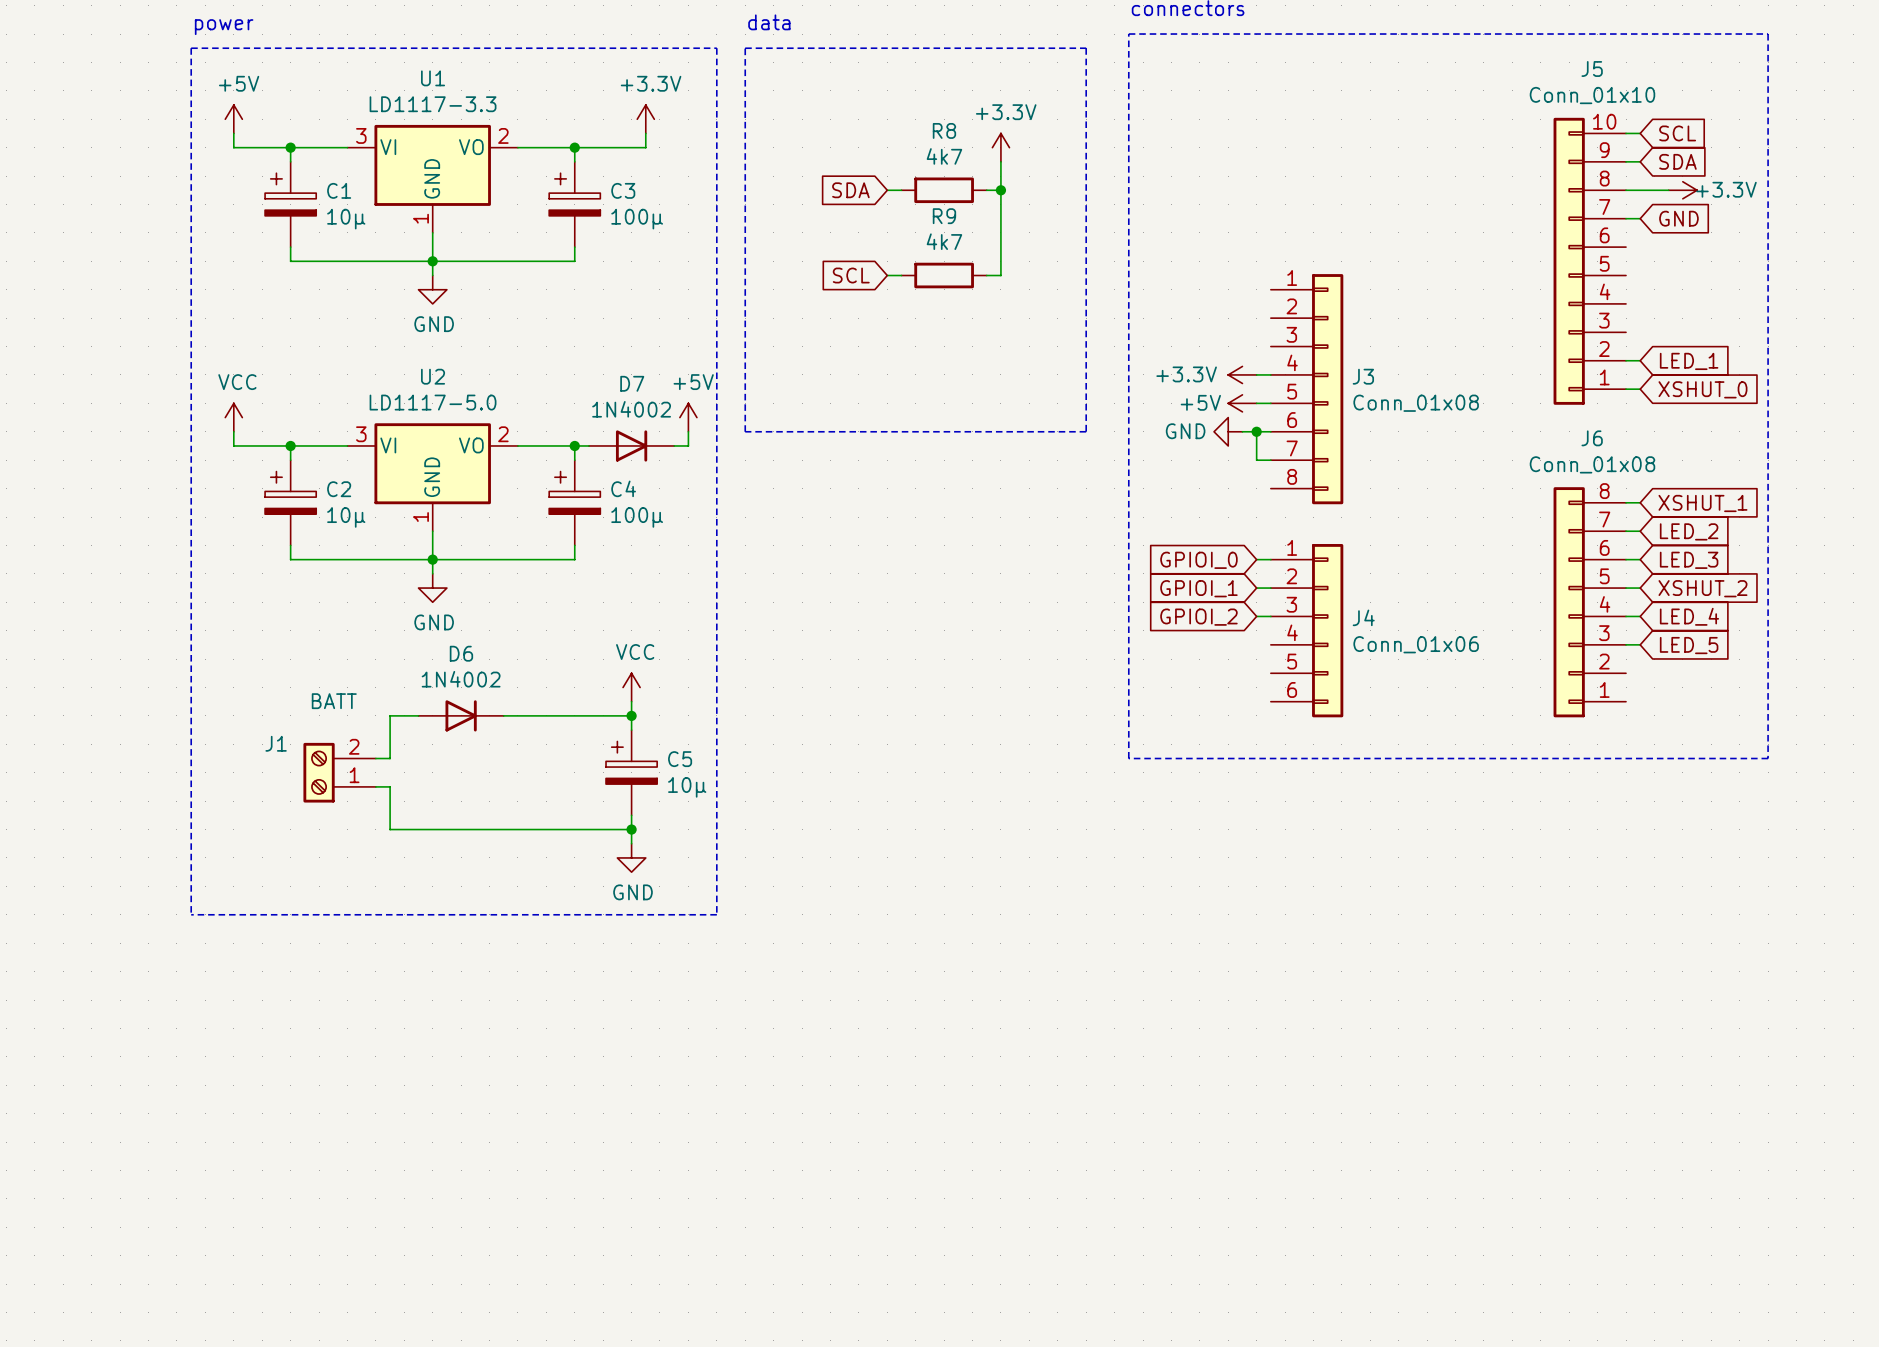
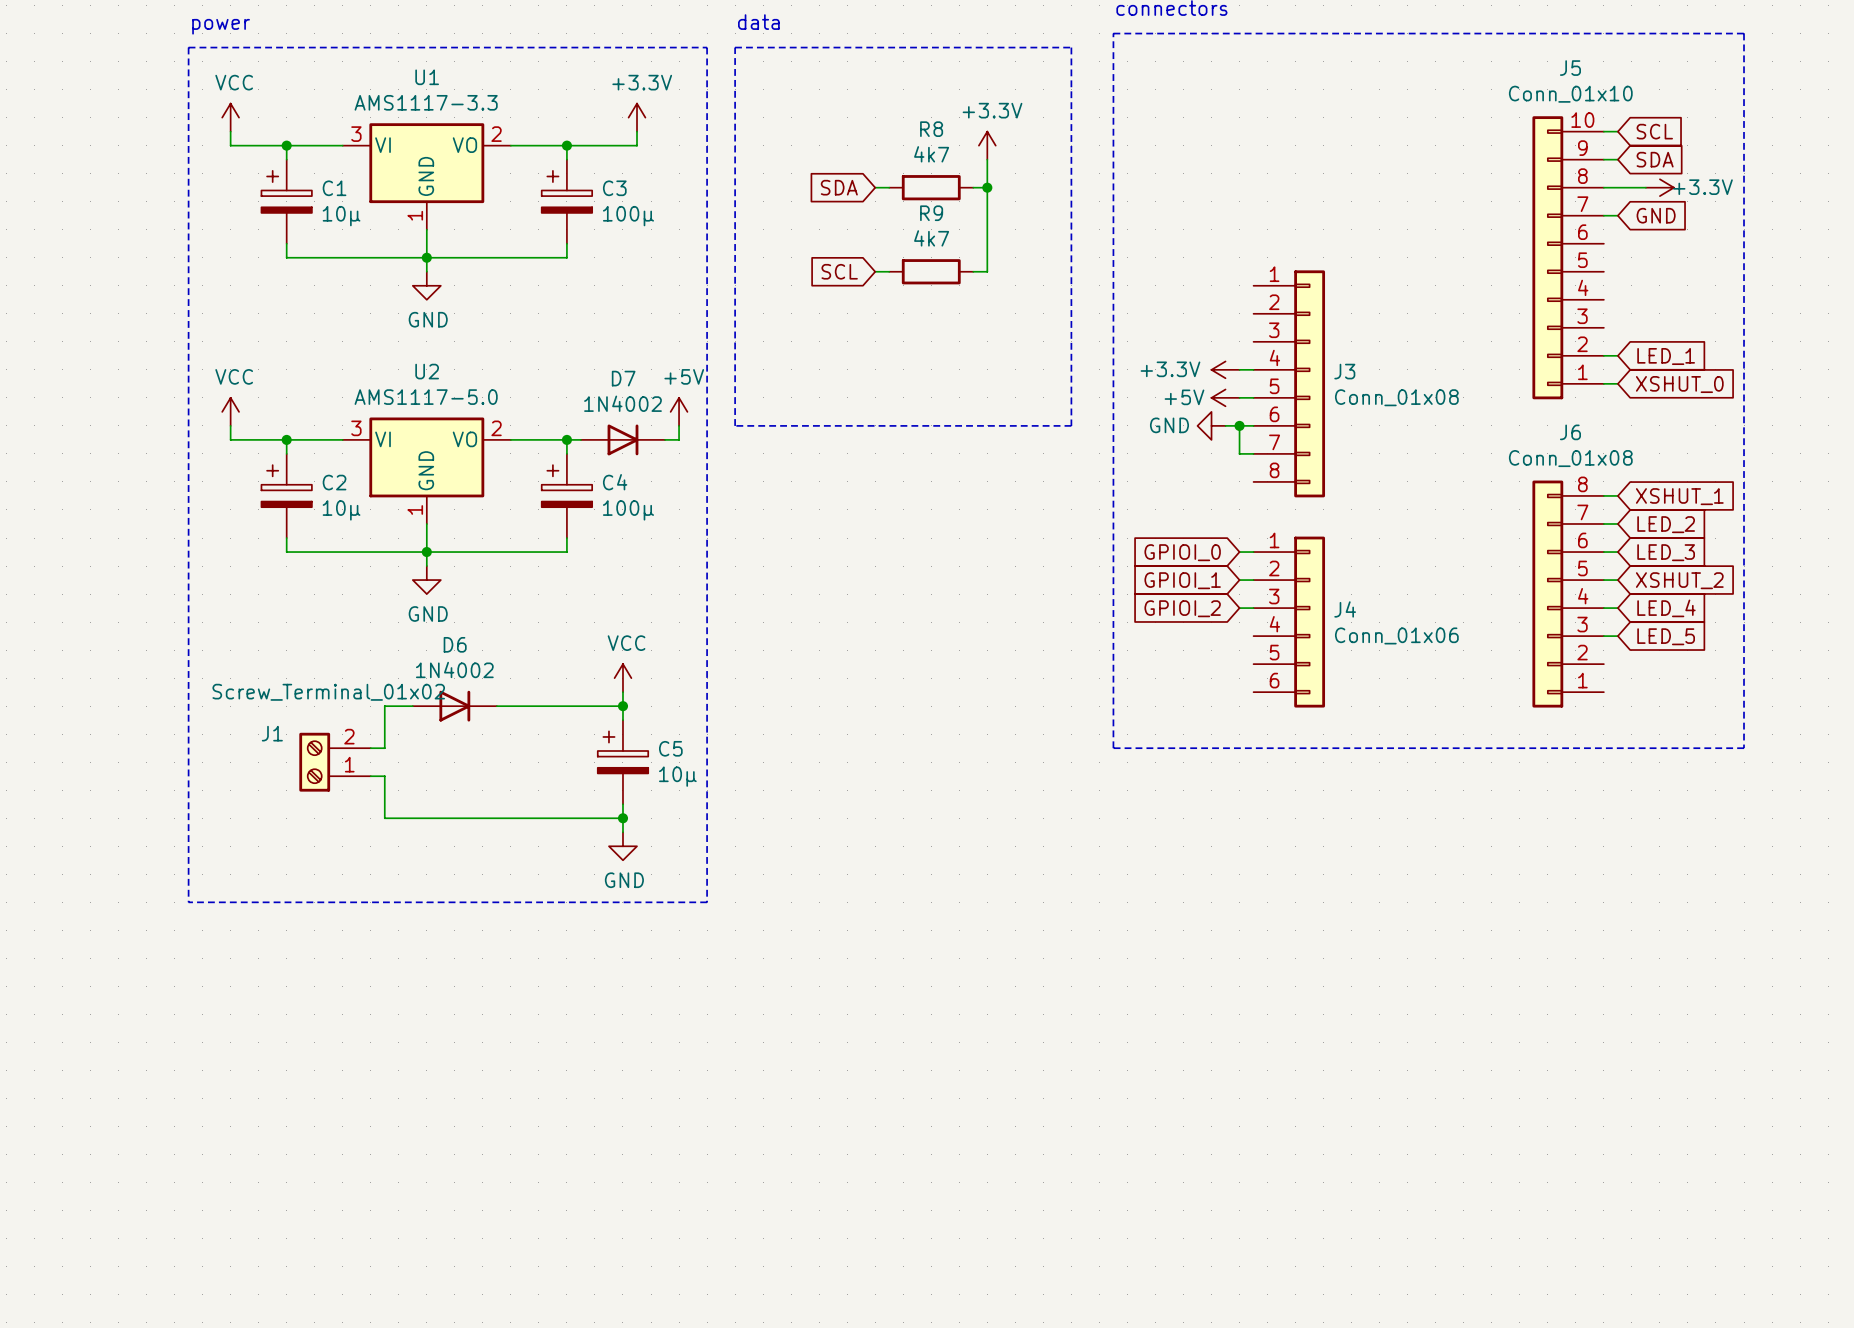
U1 value: LD1117-3.3 (433, 104) -> AMS1117-3.3 (426, 102)
power symbol: +5V (233, 119) -> VCC (230, 117)
U2 value: LD1117-5.0 (433, 402) -> AMS1117-5.0 (426, 397)
J1 value: BATT (334, 701) -> Screw_Terminal_01x02 (328, 692)

